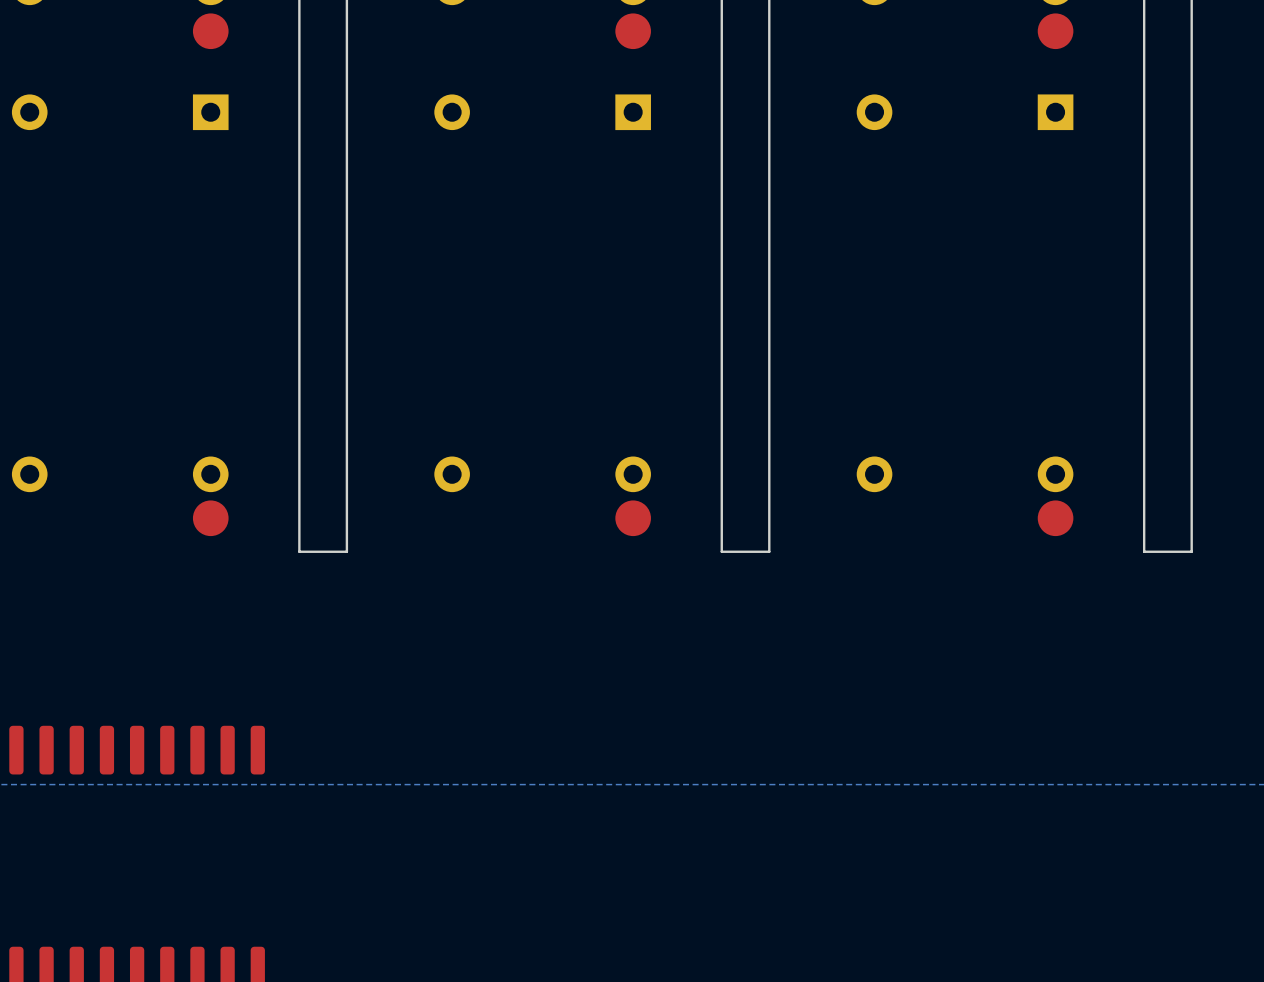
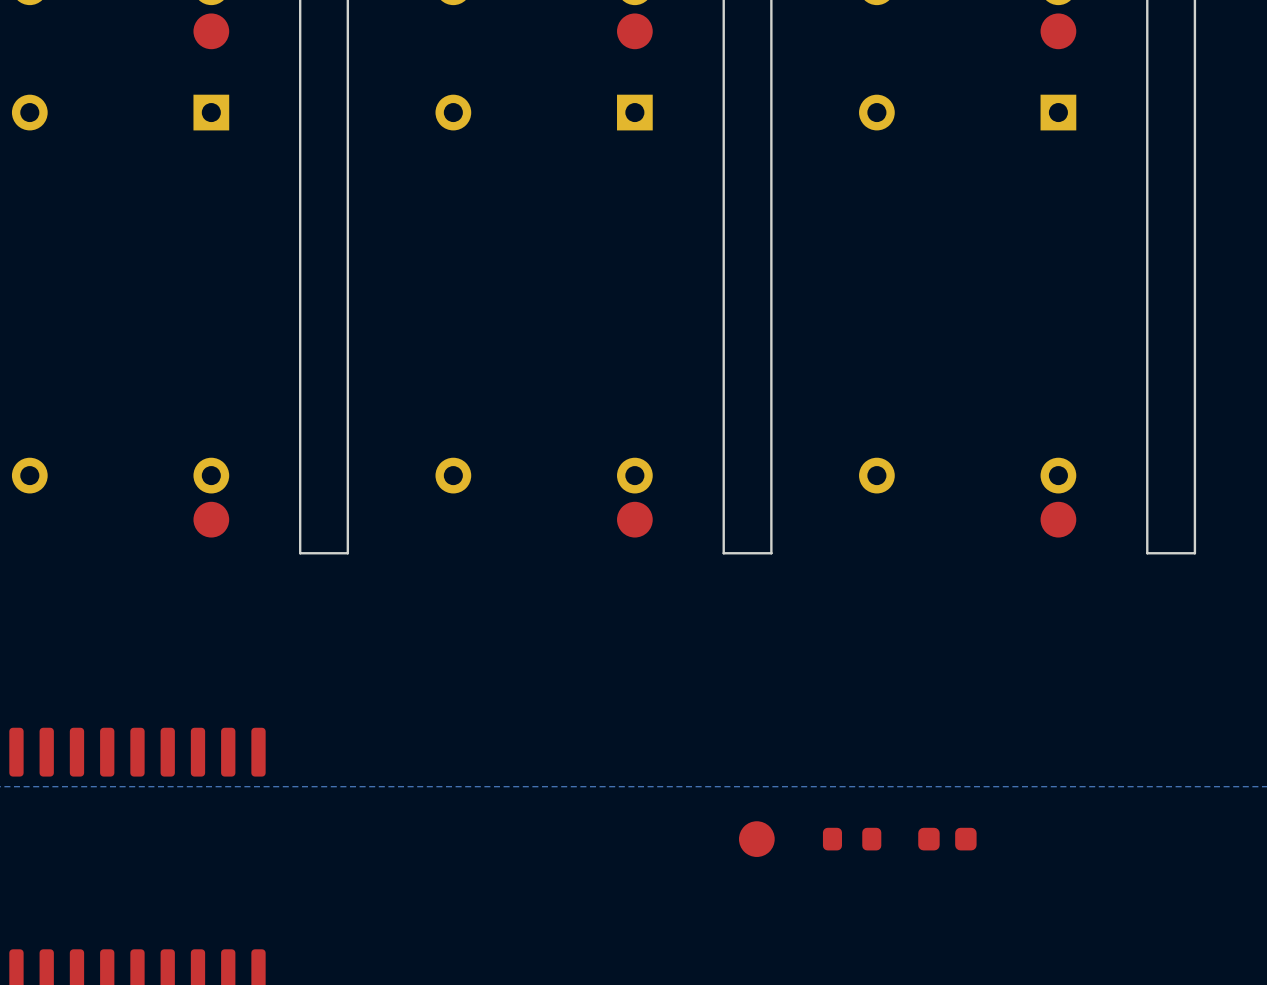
part: none -> (756, 839)
part: none -> (852, 839)
part: none -> (947, 839)

